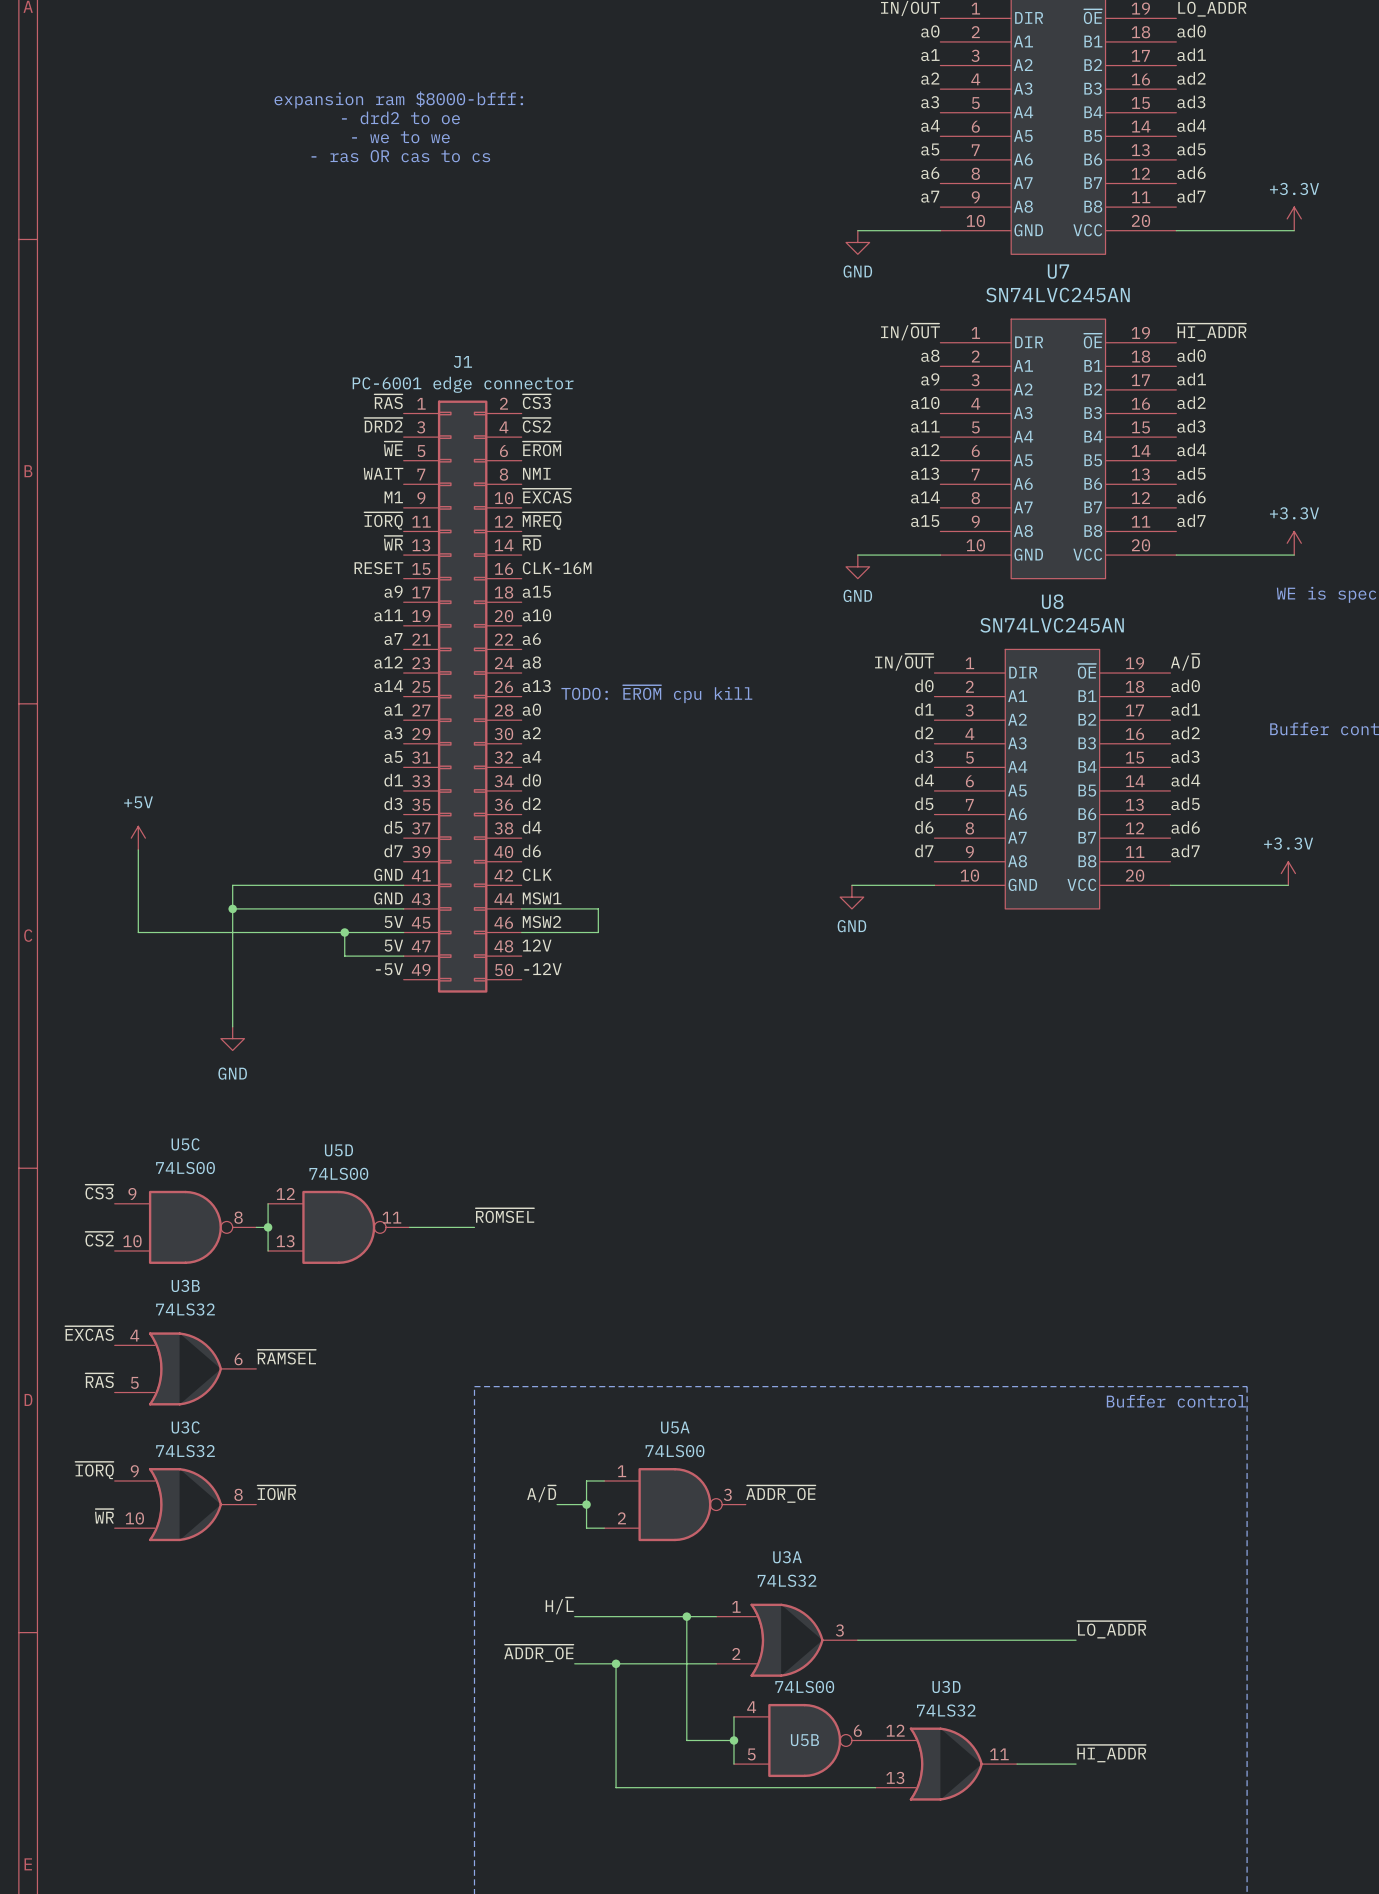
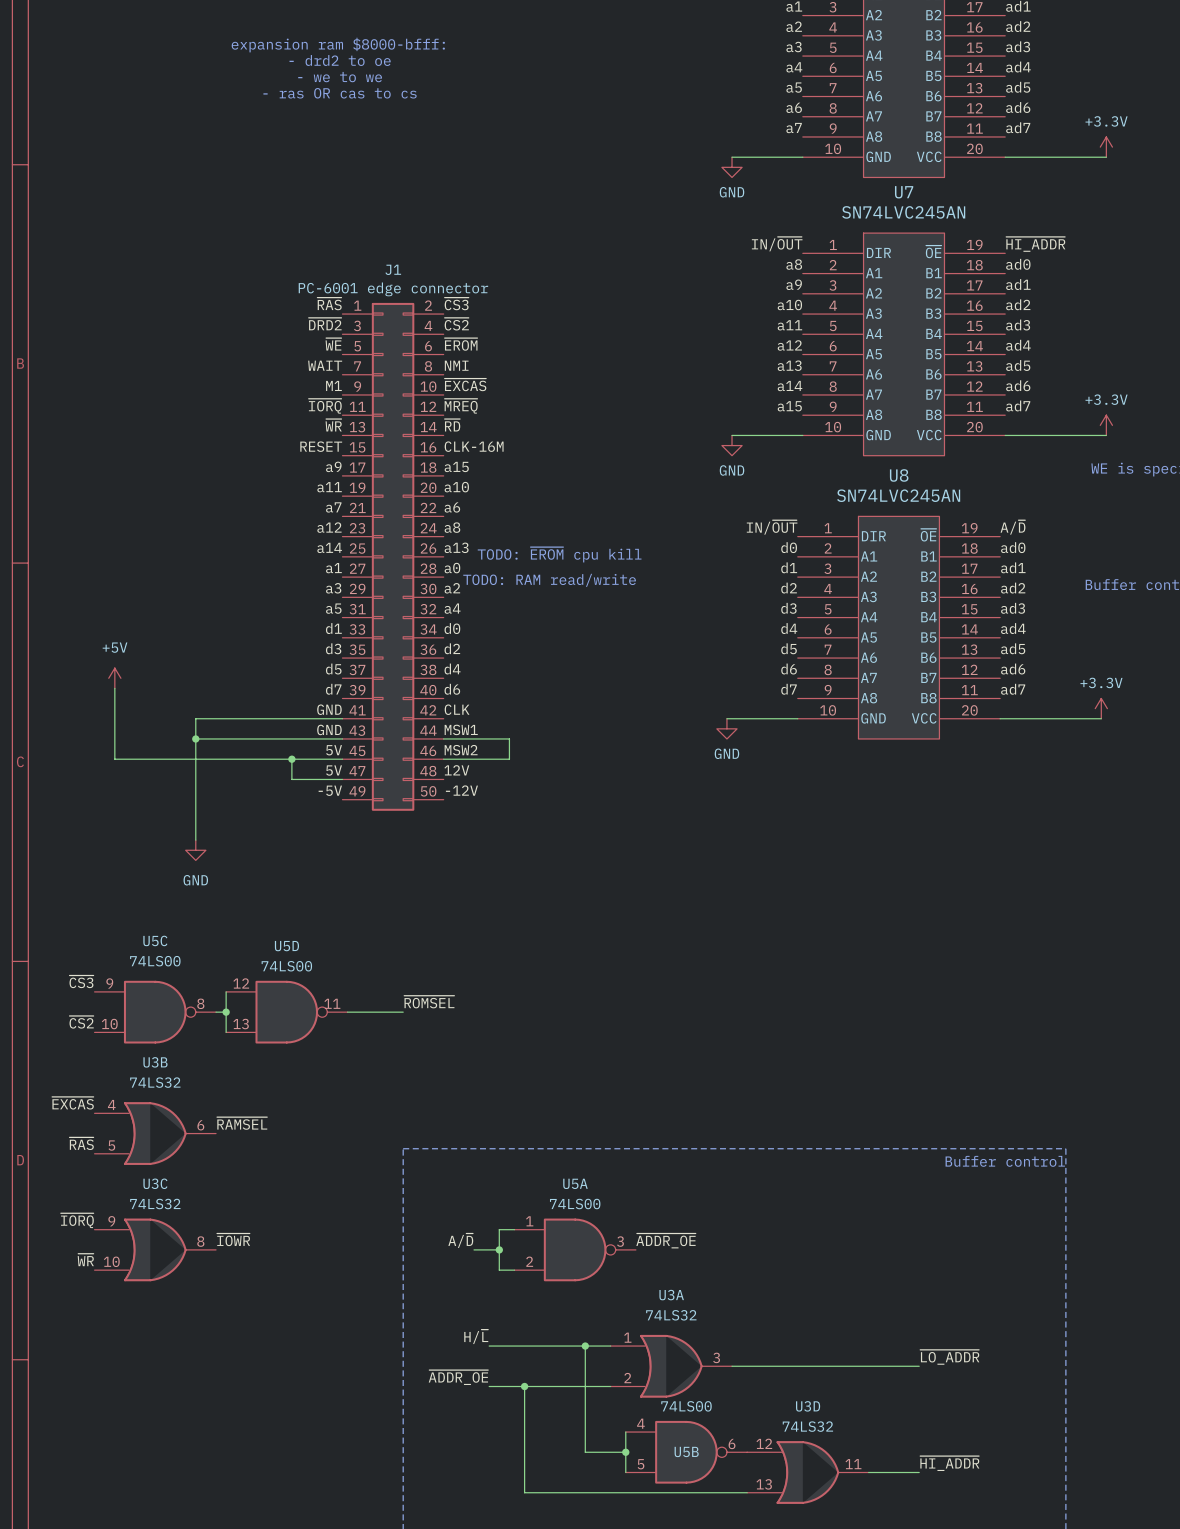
text: none -> TODO: RAM read/write (549, 580)

